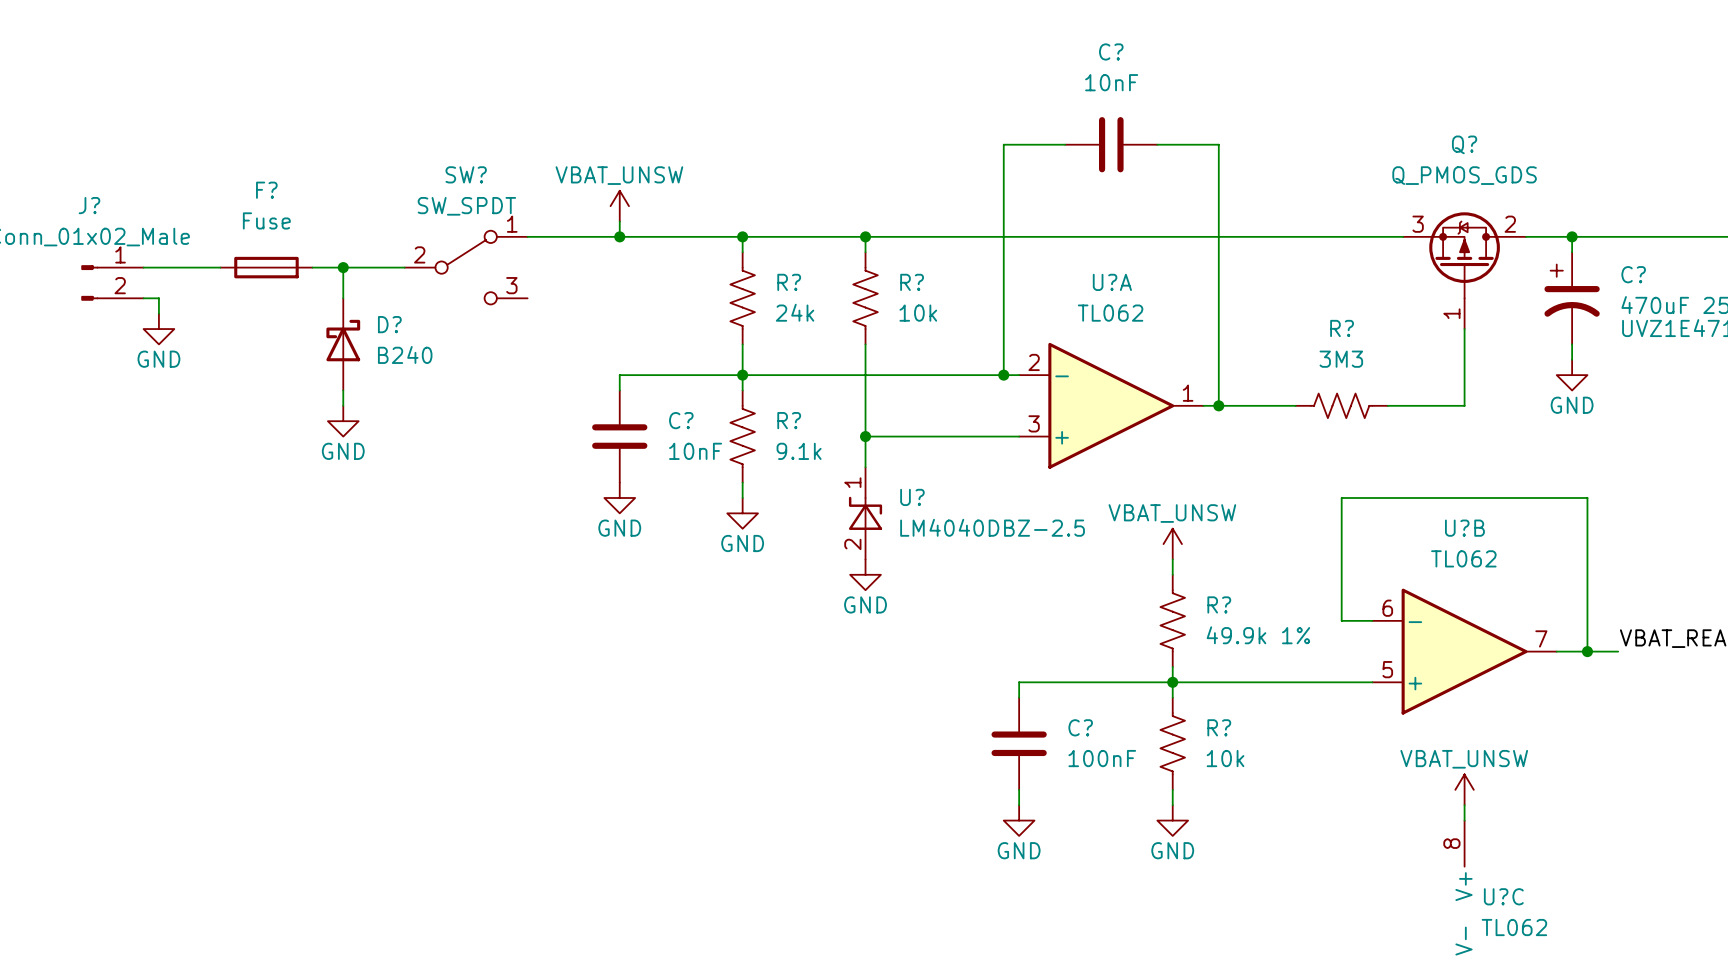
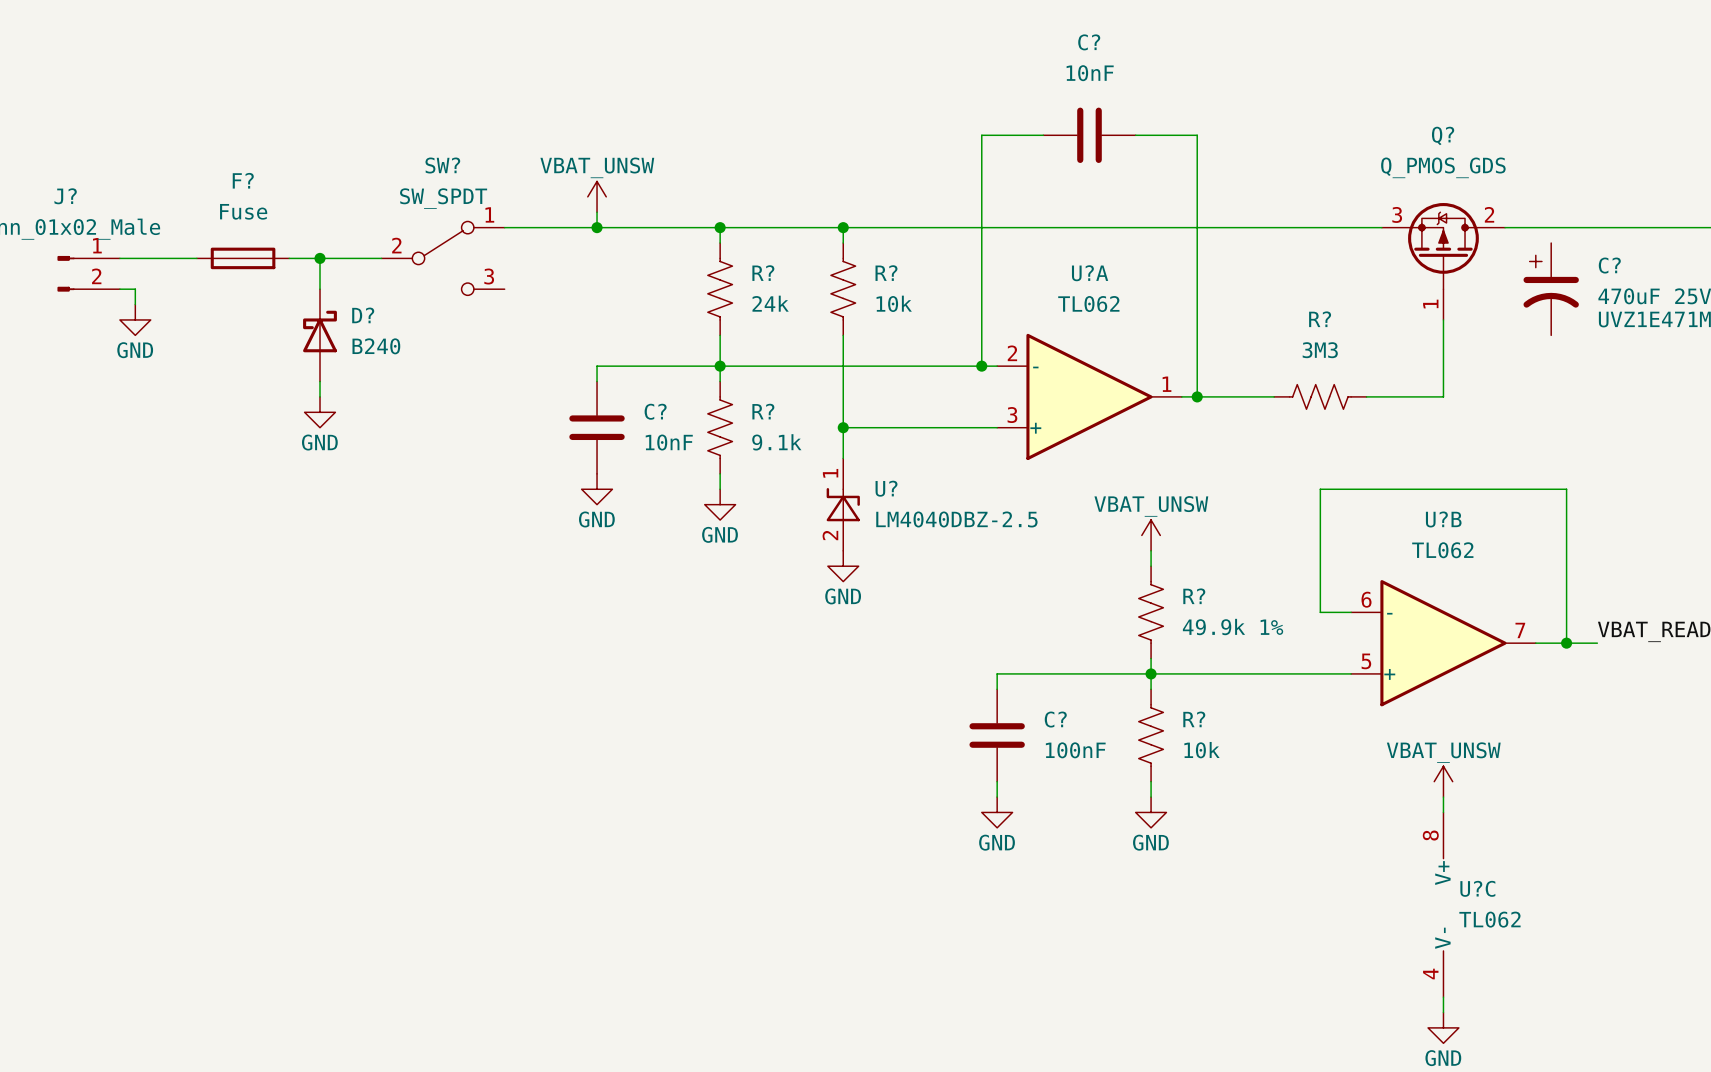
wire: (1572, 236) (1572, 252) -> none
junction: (1572, 236) -> none
wire: (1572, 344) (1572, 359) -> none
power symbol: GND (1572, 375) -> none

